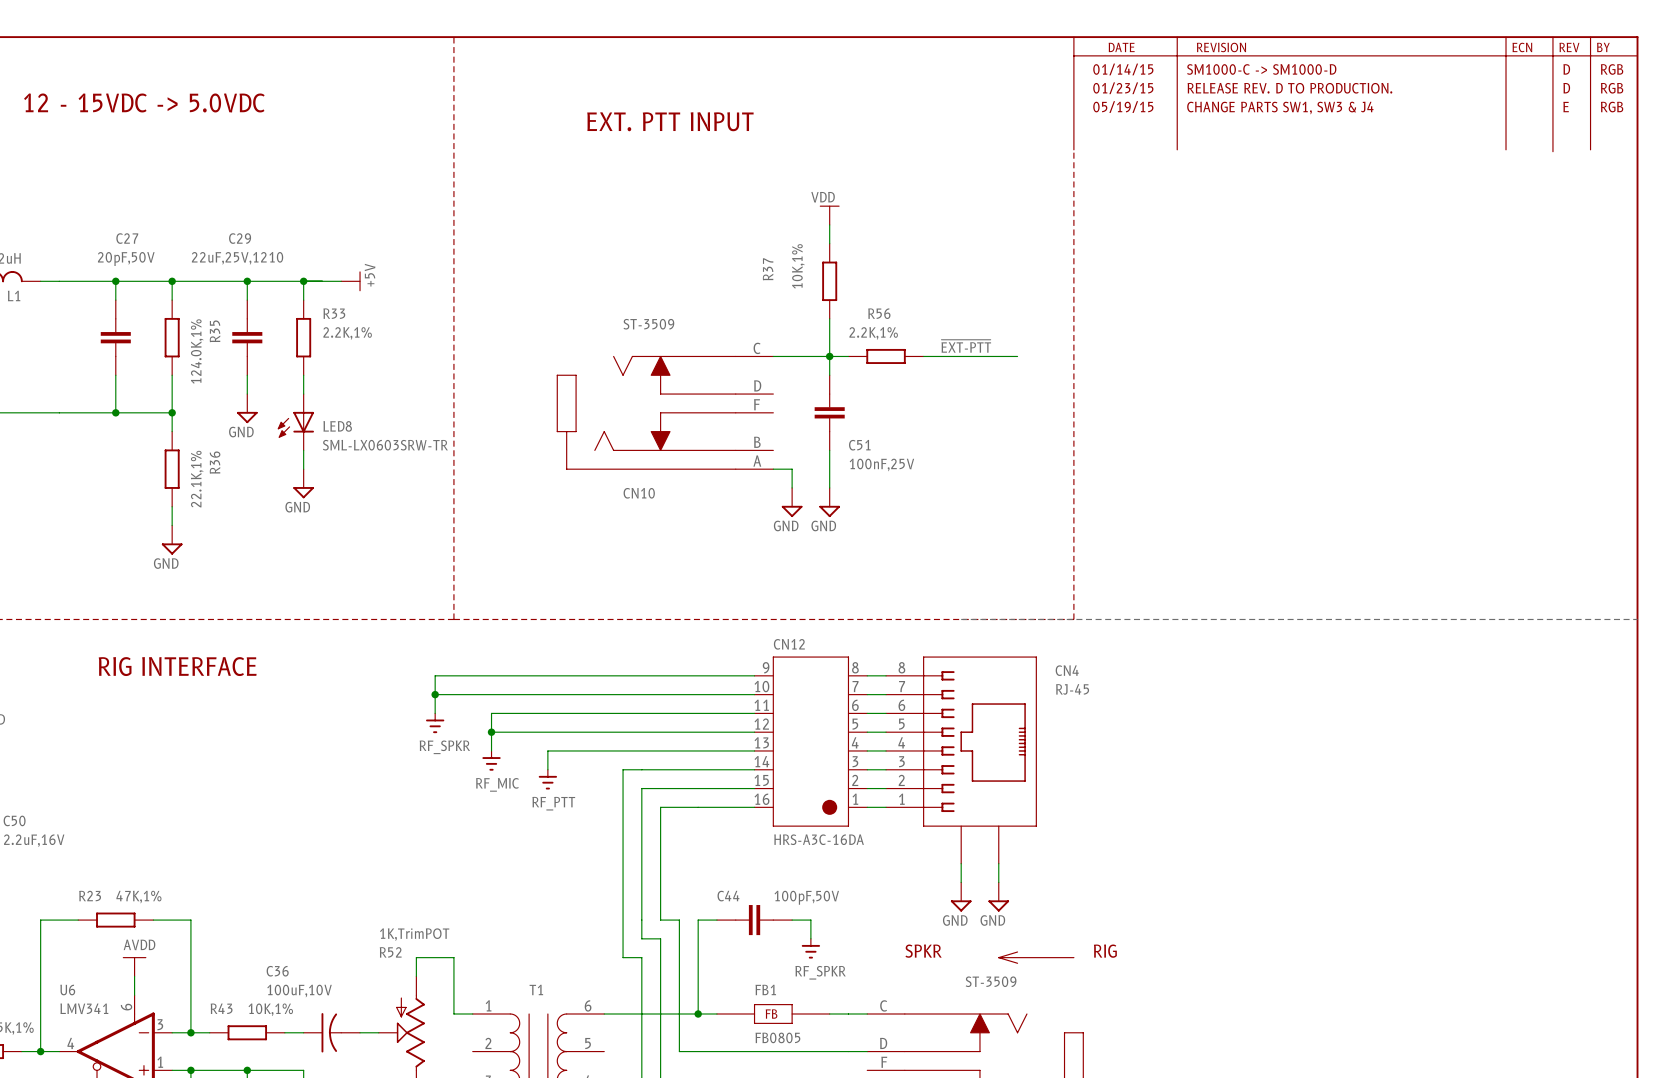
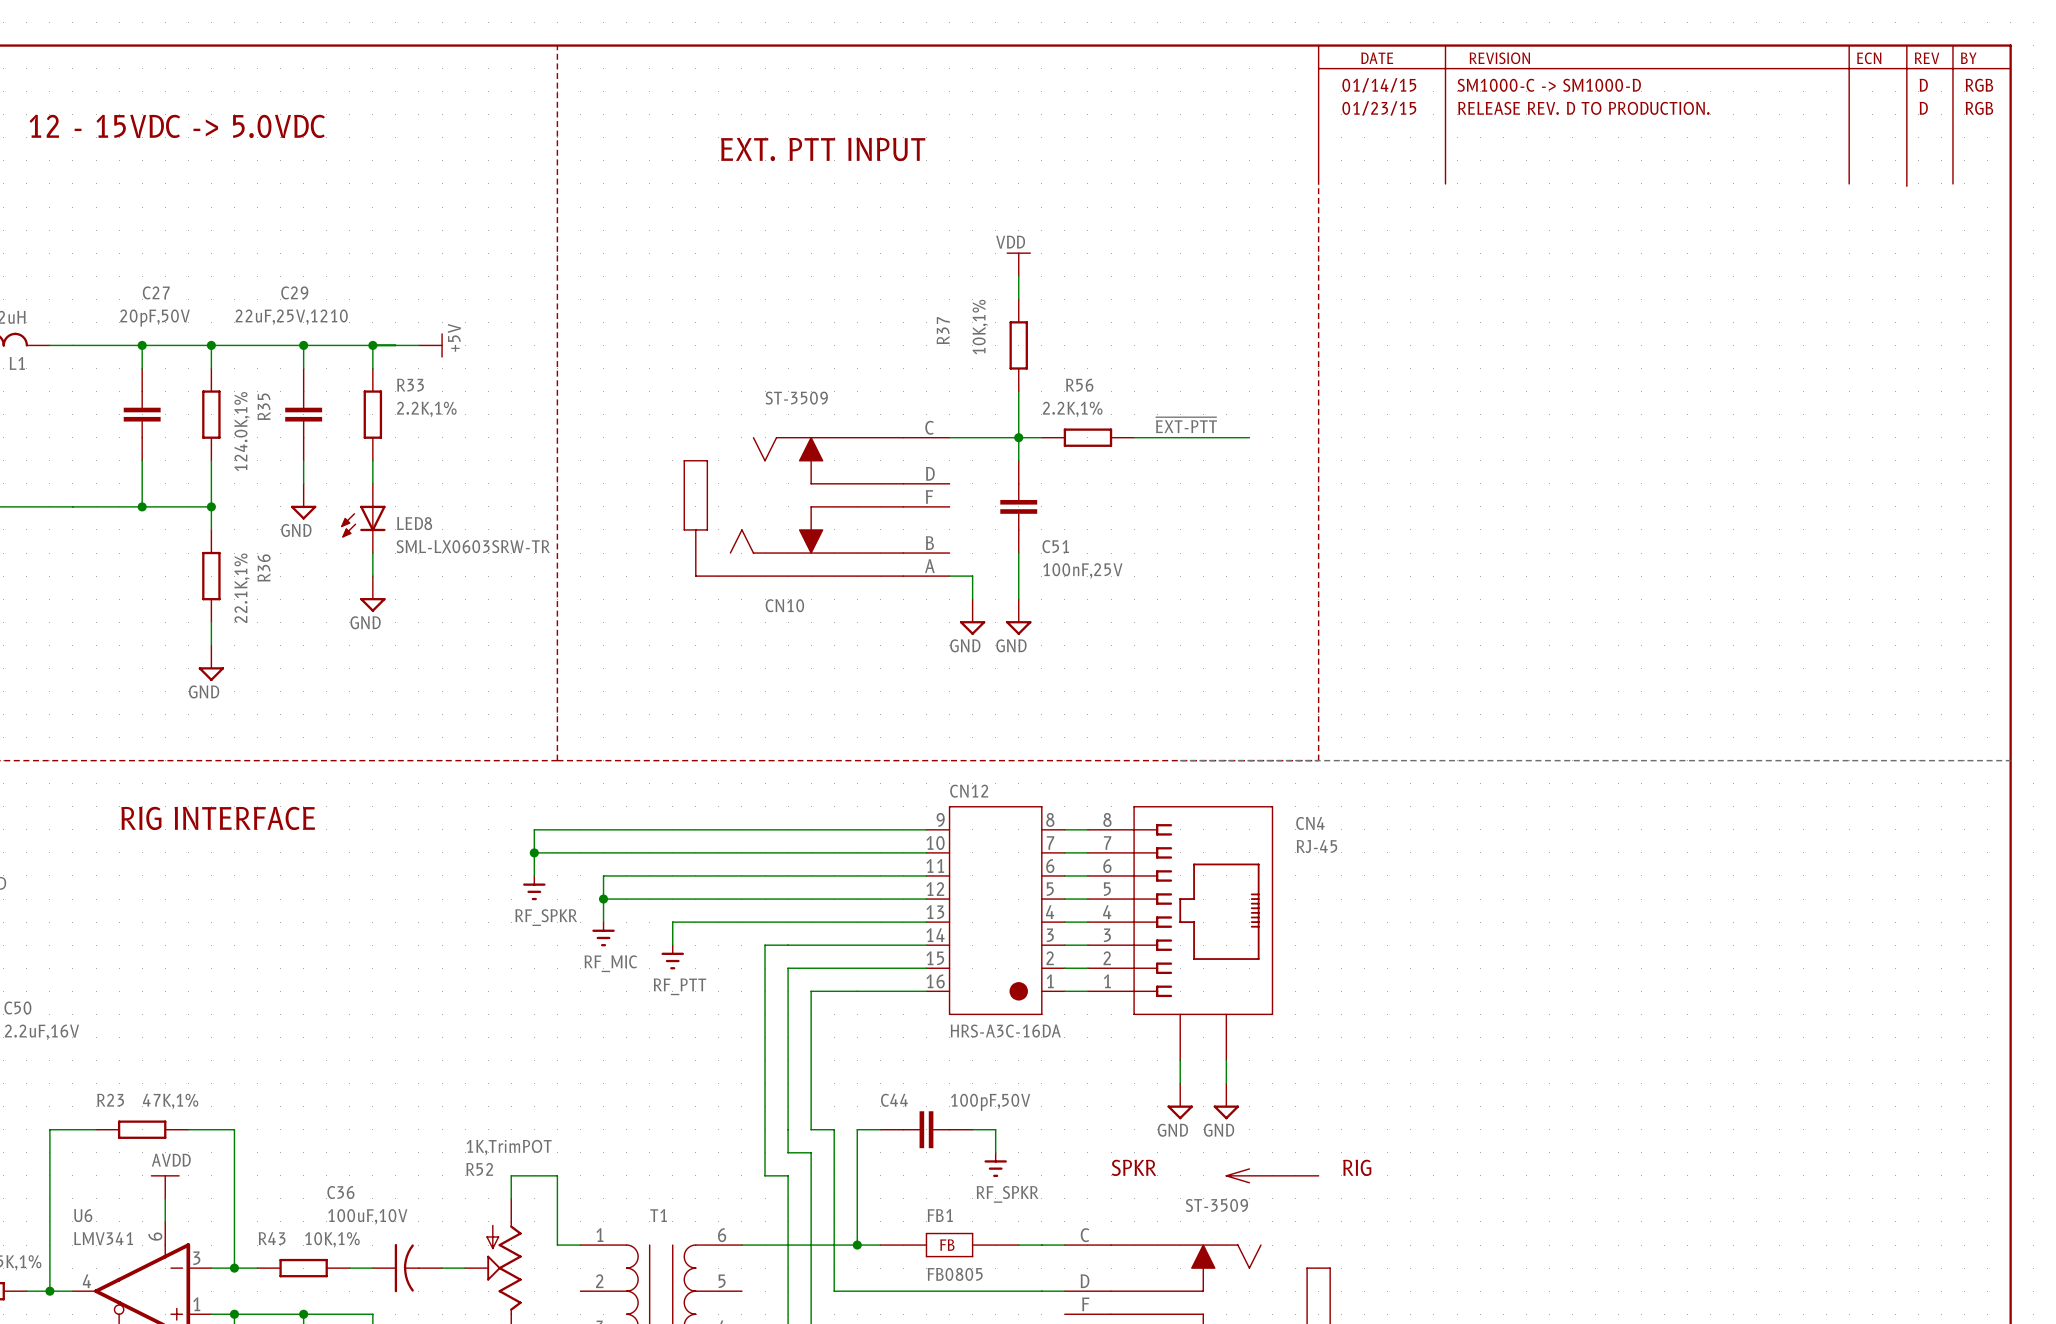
text: 05/19/15 (1123, 107) -> none
text: E (1566, 107) -> none
text: RGB (1612, 107) -> none
text: CHANGE PARTS SW1, SW3 & J4 (1280, 108) -> none

